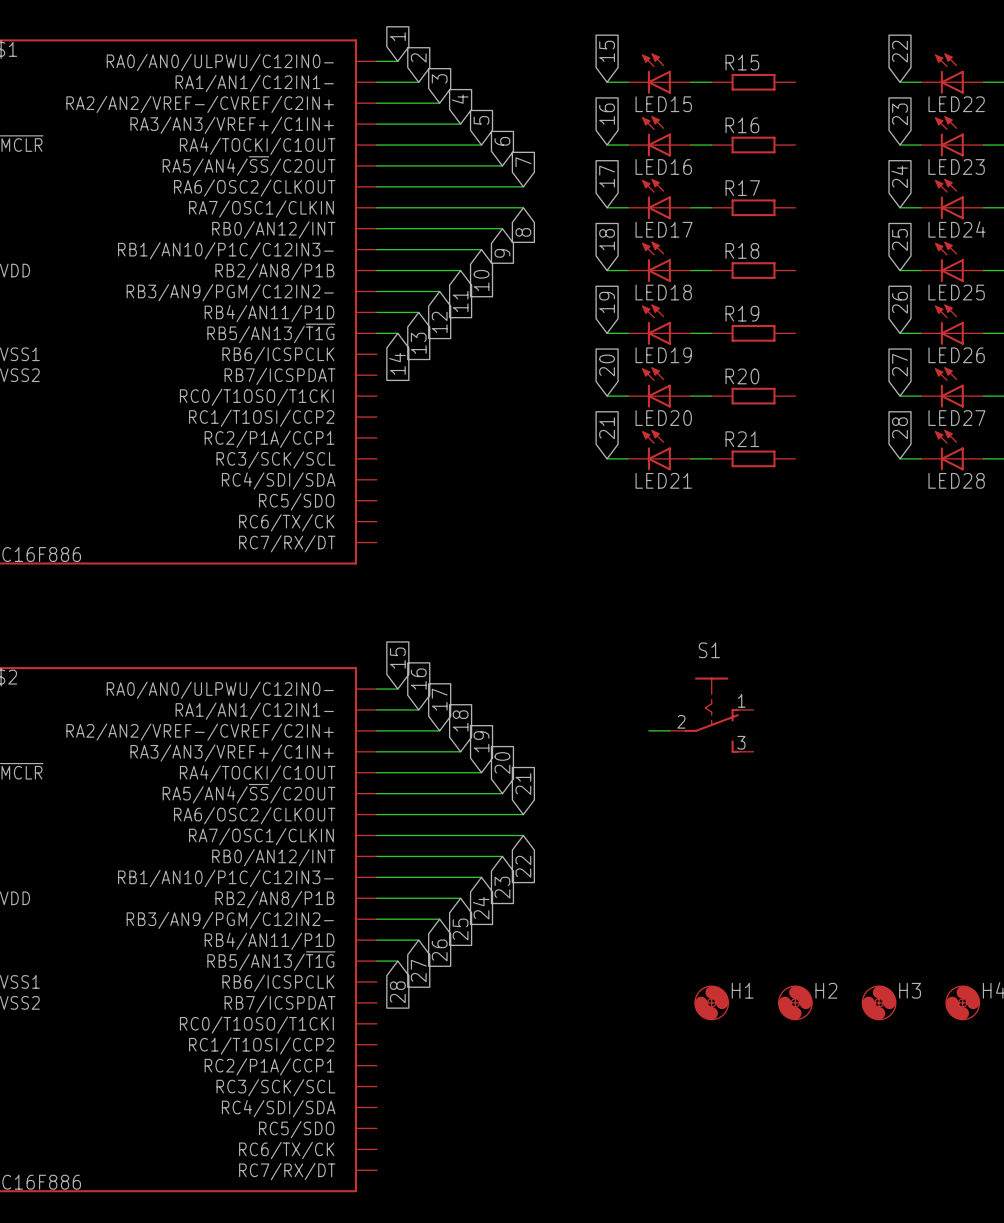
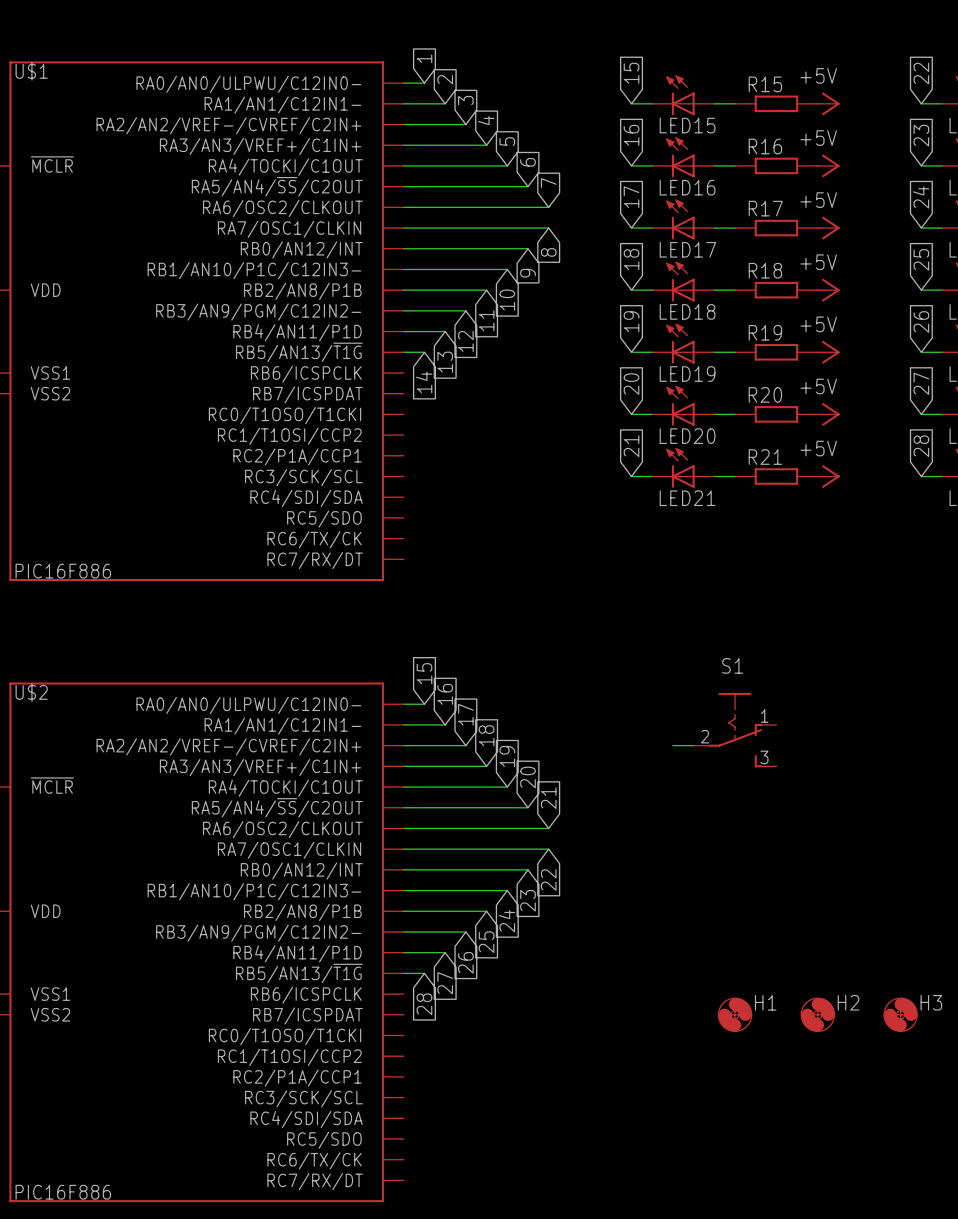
power symbol: none -> +5V (828, 103)
power symbol: none -> +5V (828, 165)
power symbol: none -> +5V (828, 228)
power symbol: none -> +5V (828, 290)
power symbol: none -> +5V (828, 352)
power symbol: none -> +5V (828, 414)
power symbol: none -> +5V (828, 476)

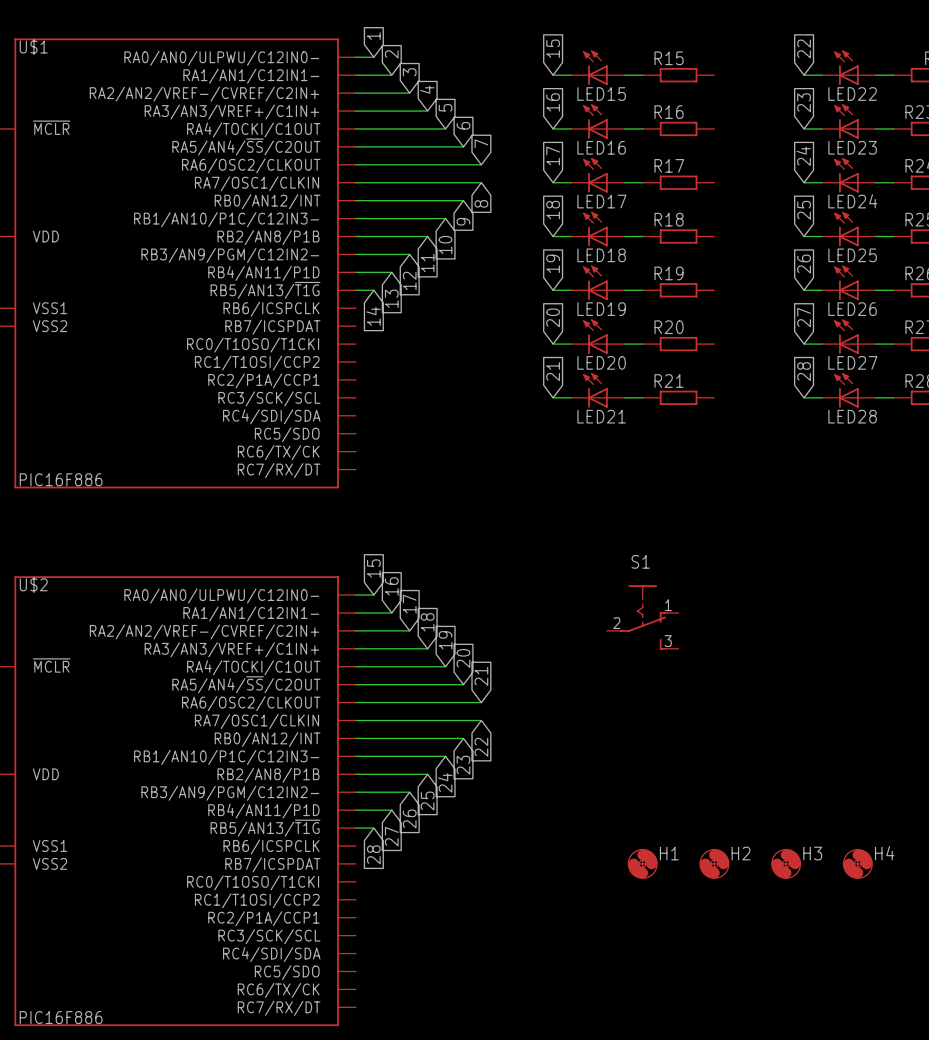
power symbol: +5V (828, 103) -> none
power symbol: +5V (828, 165) -> none
power symbol: +5V (828, 228) -> none
power symbol: +5V (828, 290) -> none
power symbol: +5V (828, 352) -> none
power symbol: +5V (828, 414) -> none
power symbol: +5V (828, 476) -> none
wire: (672, 745) (693, 745) -> none

